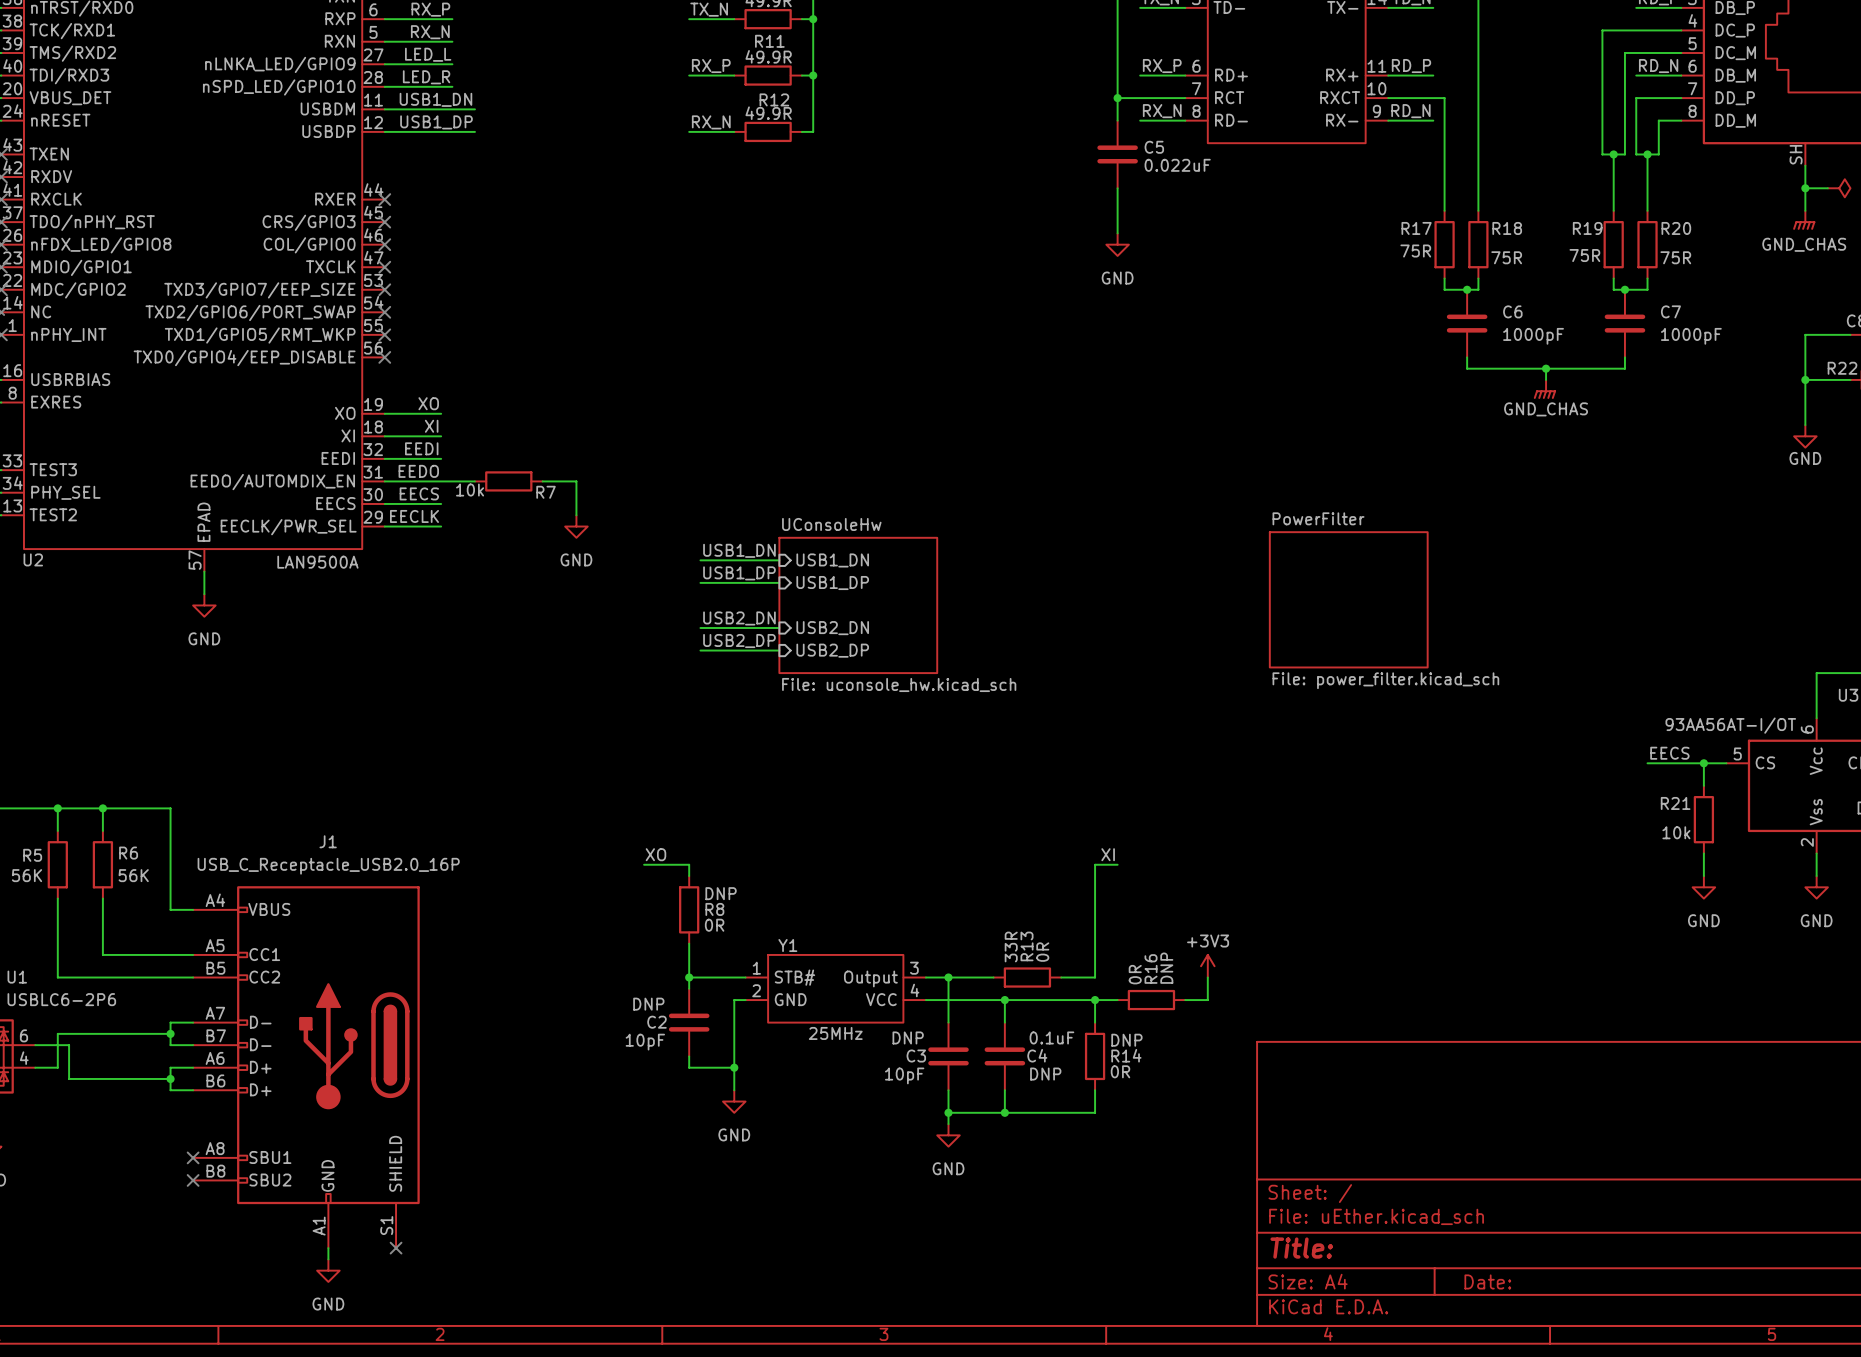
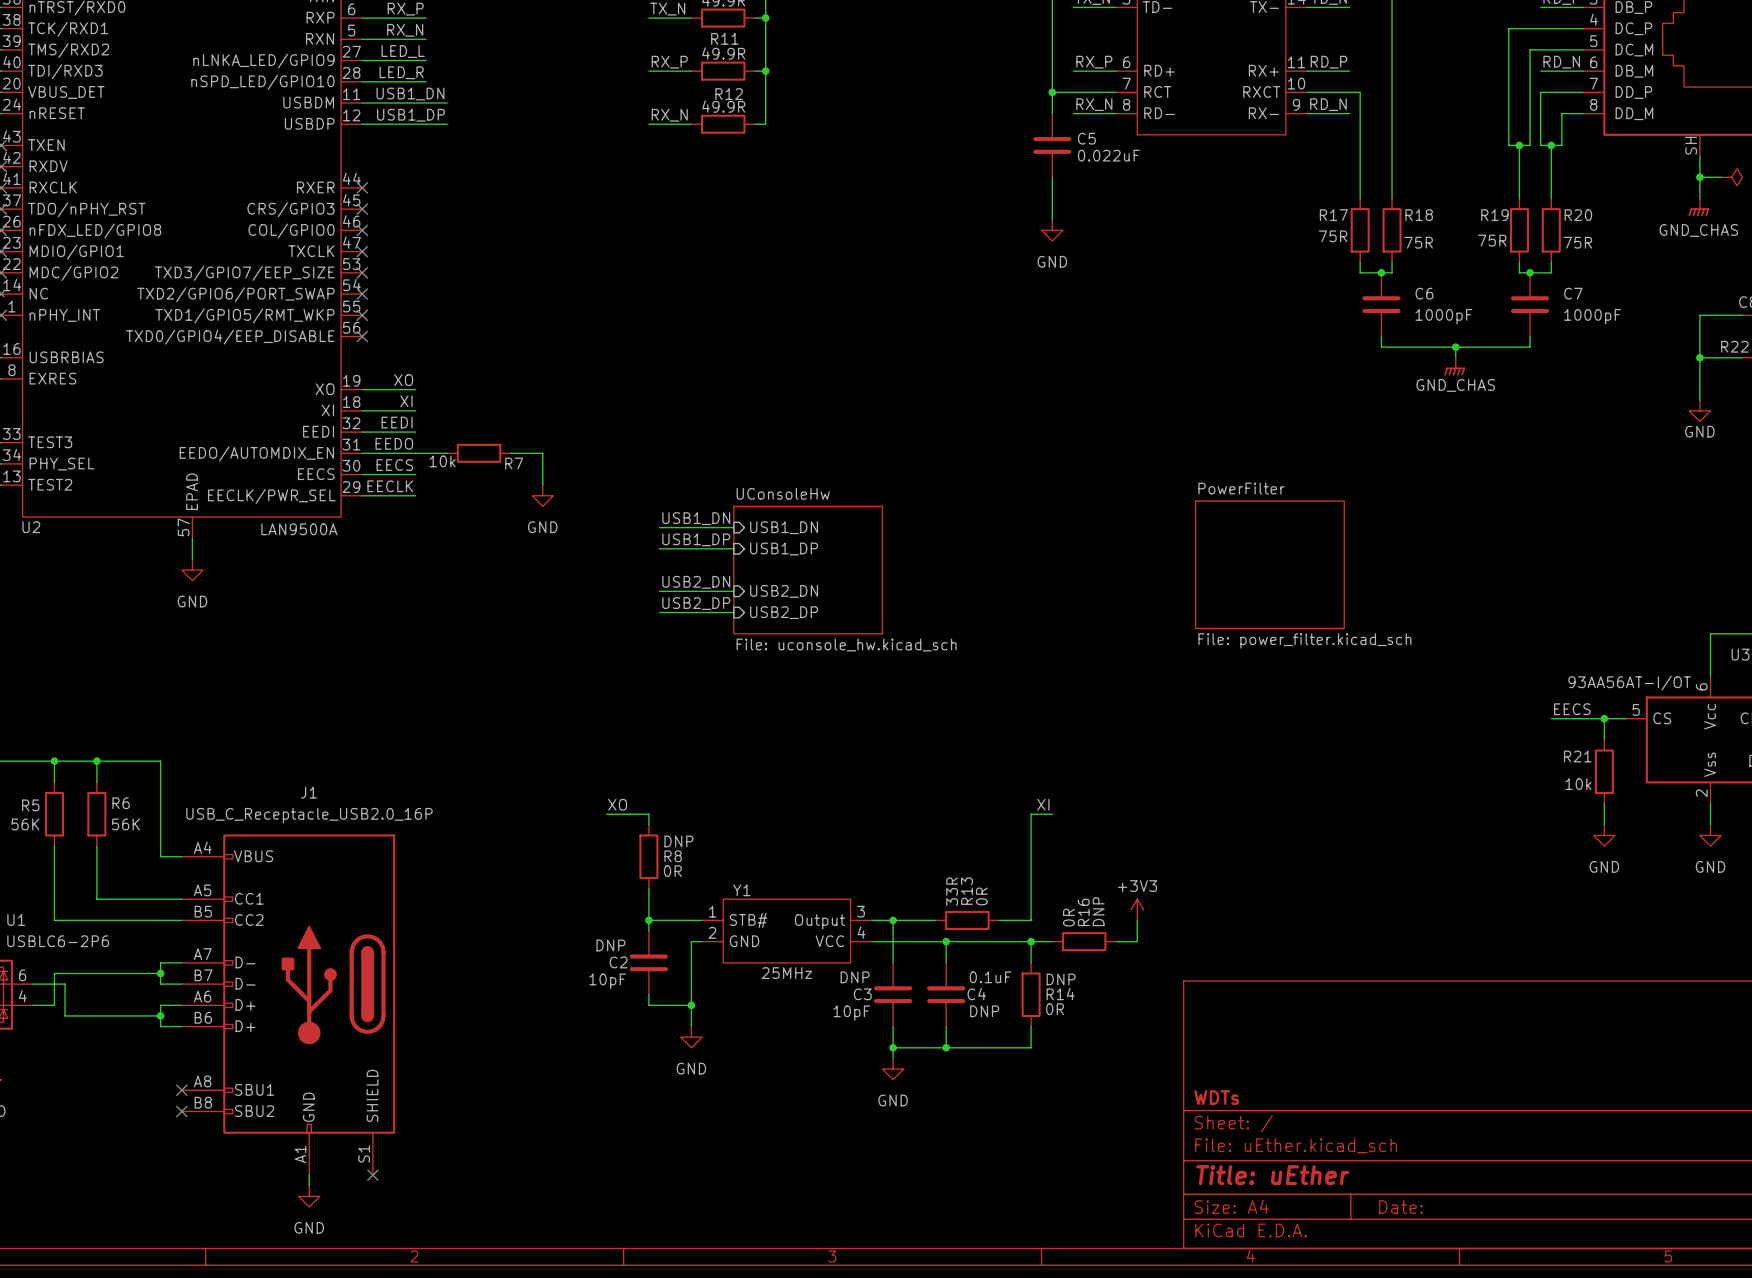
title block: none -> WDTs (1216, 1097)
title block: Title: (1301, 1248) -> Title: uEther (1272, 1175)

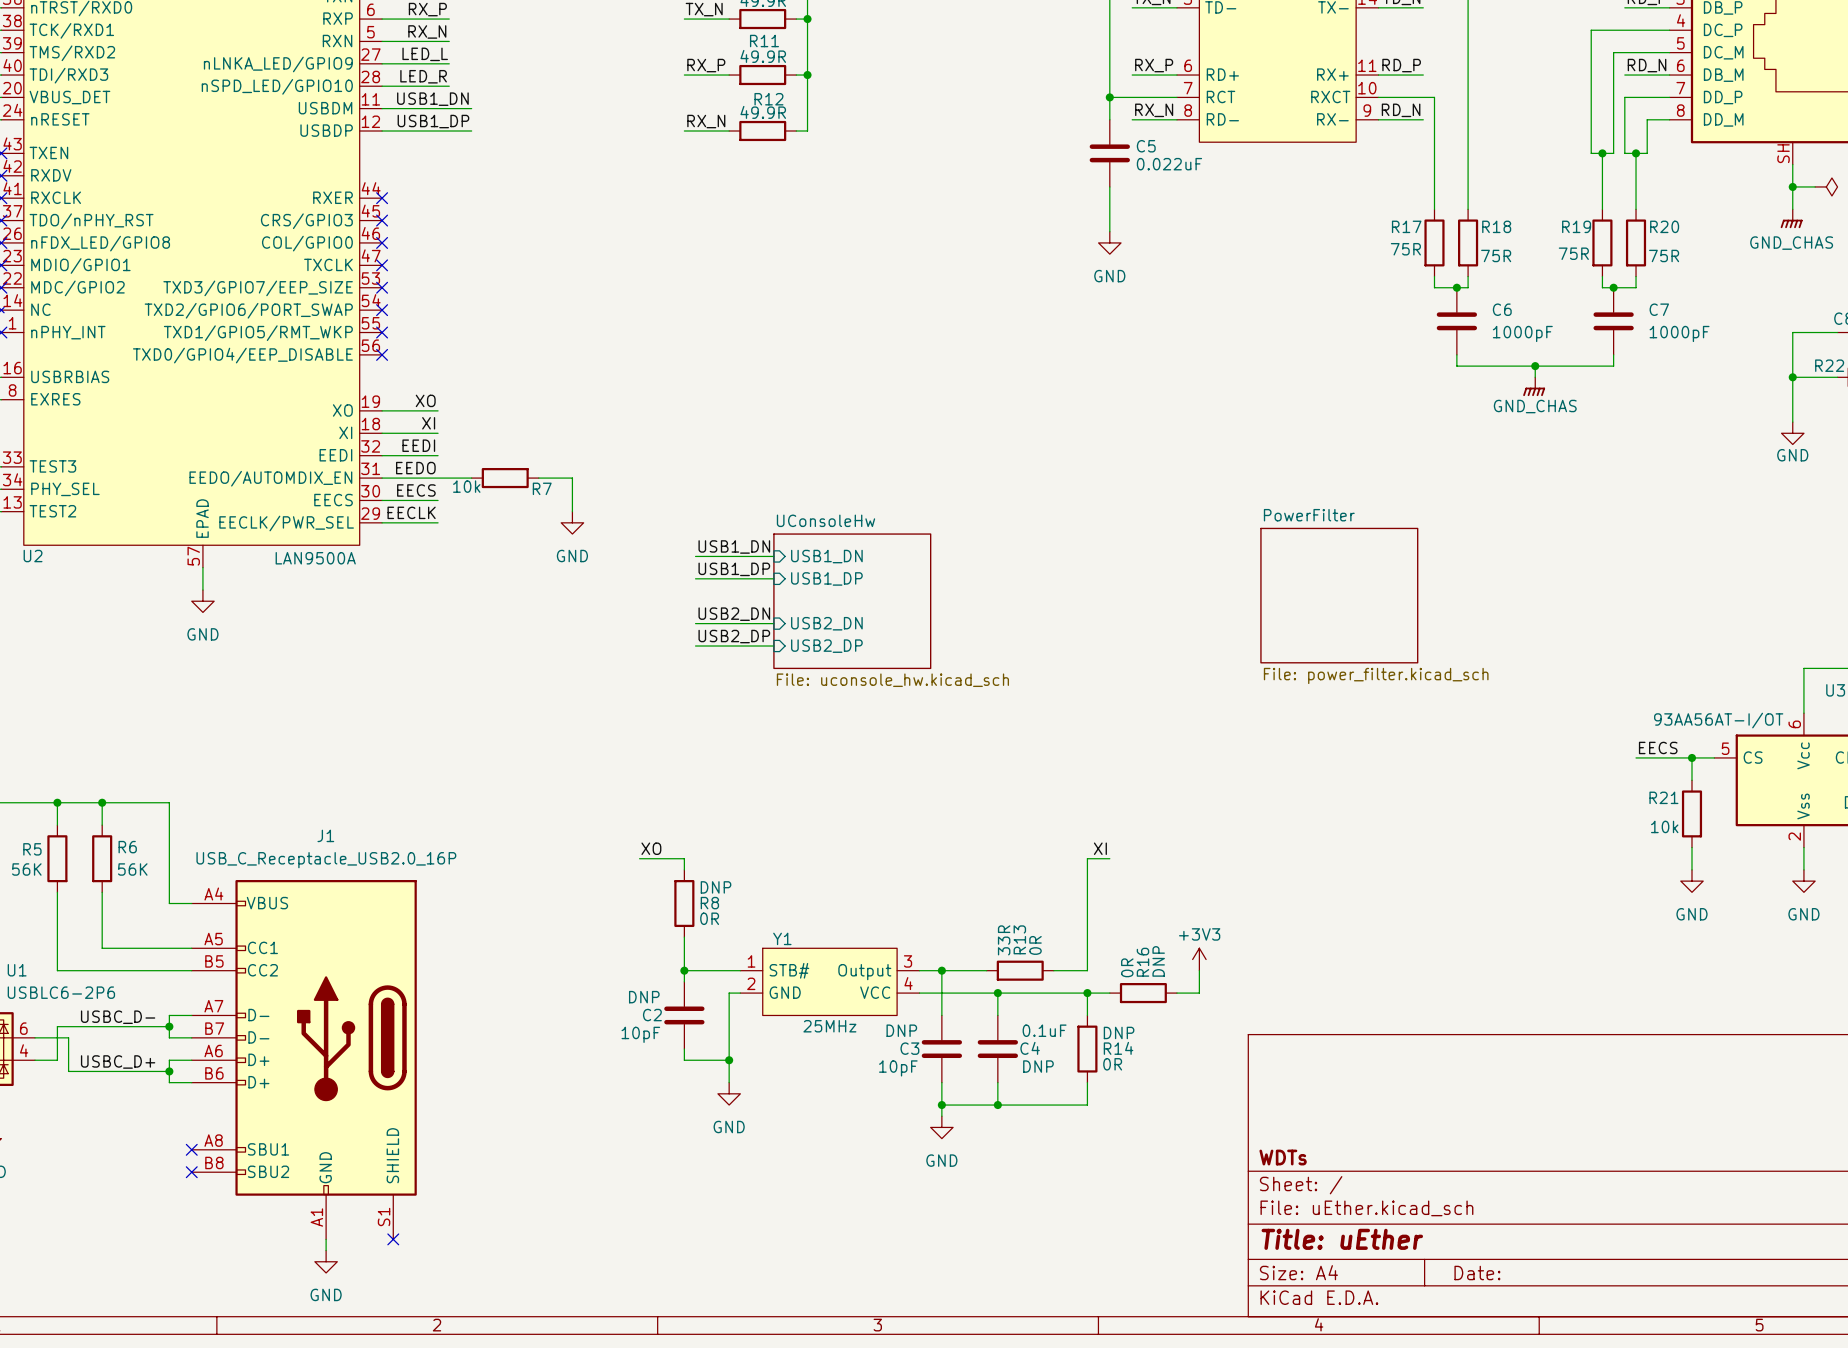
label: none -> USBC_D- (118, 1017)
label: none -> USBC_D+ (118, 1061)

